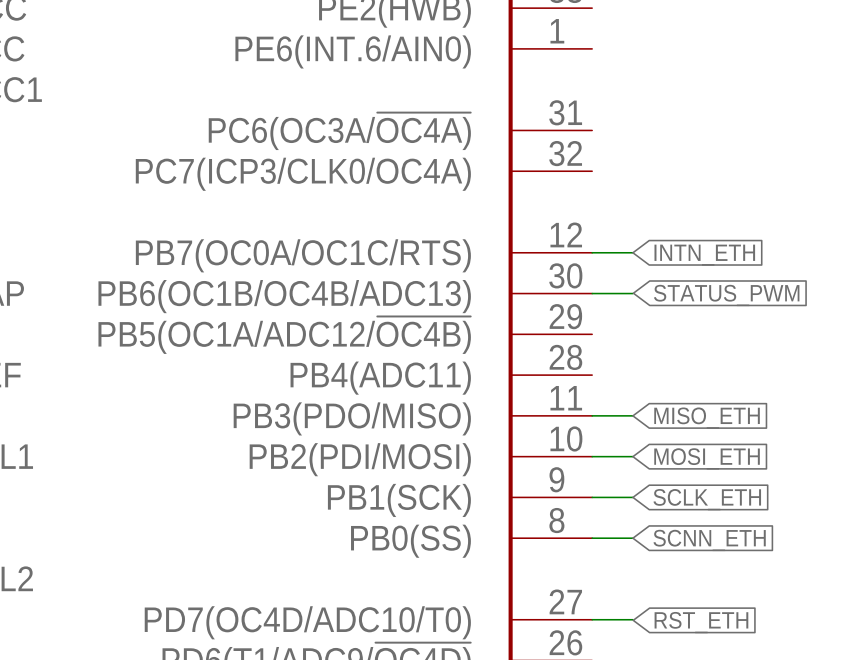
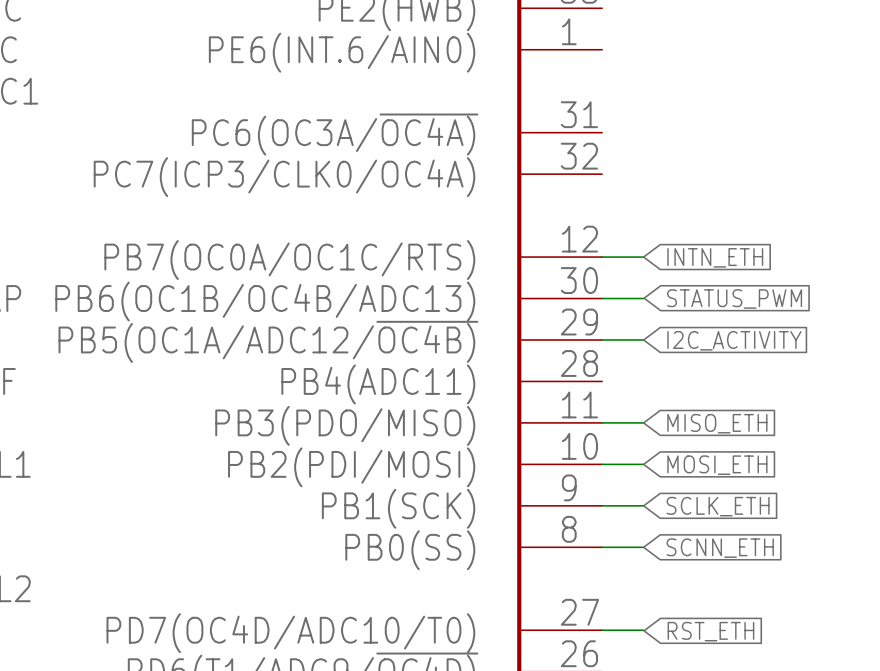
wire: none -> (602, 339) (643, 339)
global label: none -> I2C_ACTIVITY (734, 340)

